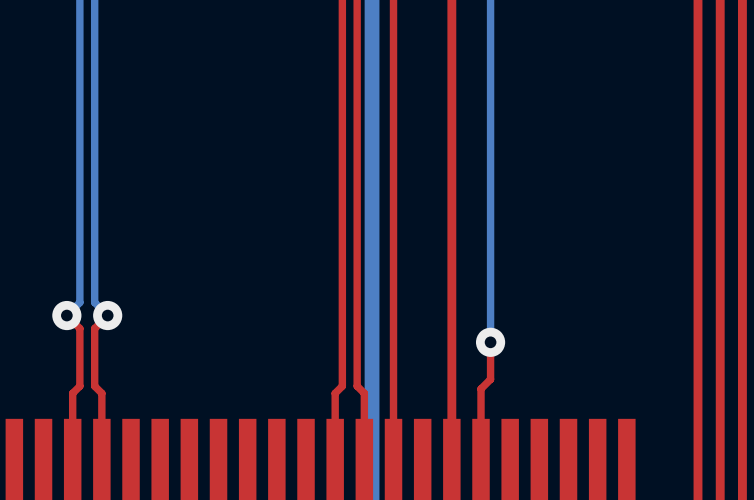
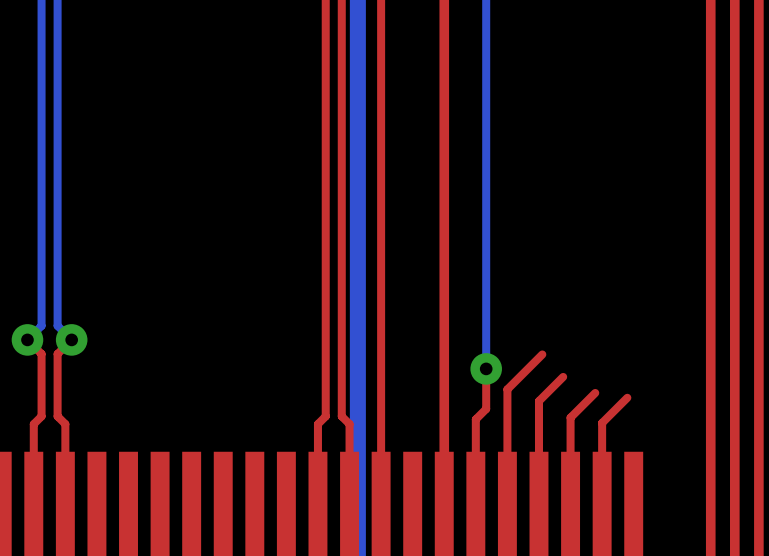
top track: none -> (542, 354) (507, 389) (507, 507)
top track: none -> (563, 376) (538, 401) (538, 507)
top track: none -> (595, 392) (570, 417) (570, 507)
top track: none -> (627, 397) (602, 422) (602, 507)

